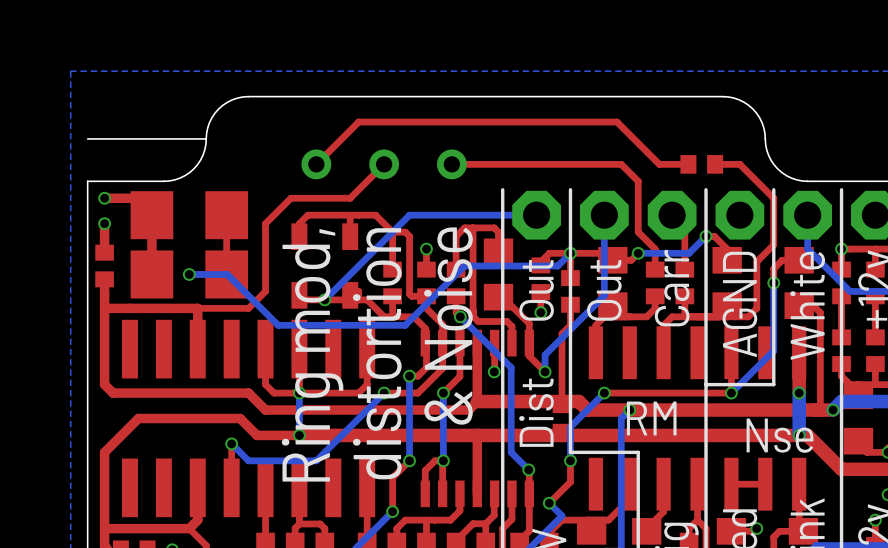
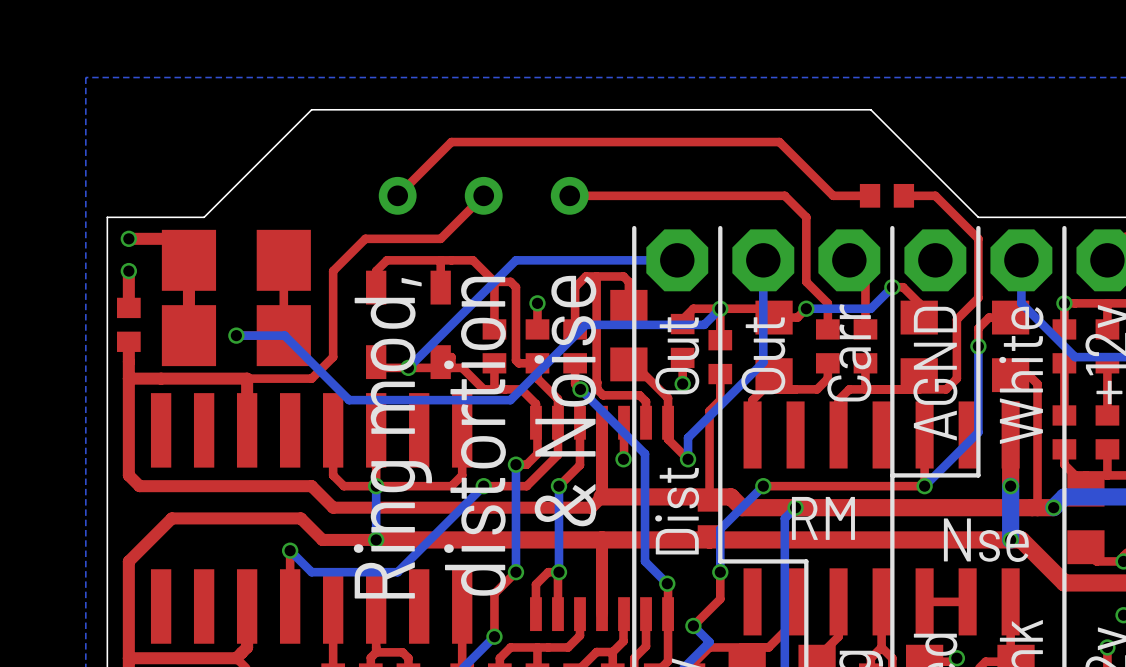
board edge: (248, 96) (232, 99) (218, 109) (209, 122) (206, 138) -> (311, 109) (204, 217)
board edge: (689, 96) (728, 96) (748, 105) (762, 122) (766, 149) (774, 164) (791, 178) (807, 181) -> (870, 109) (978, 217) (1021, 217)
board edge: (206, 138) (87, 138) -> none
board edge: (206, 138) (203, 155) (193, 168) (180, 178) (163, 181) -> none

